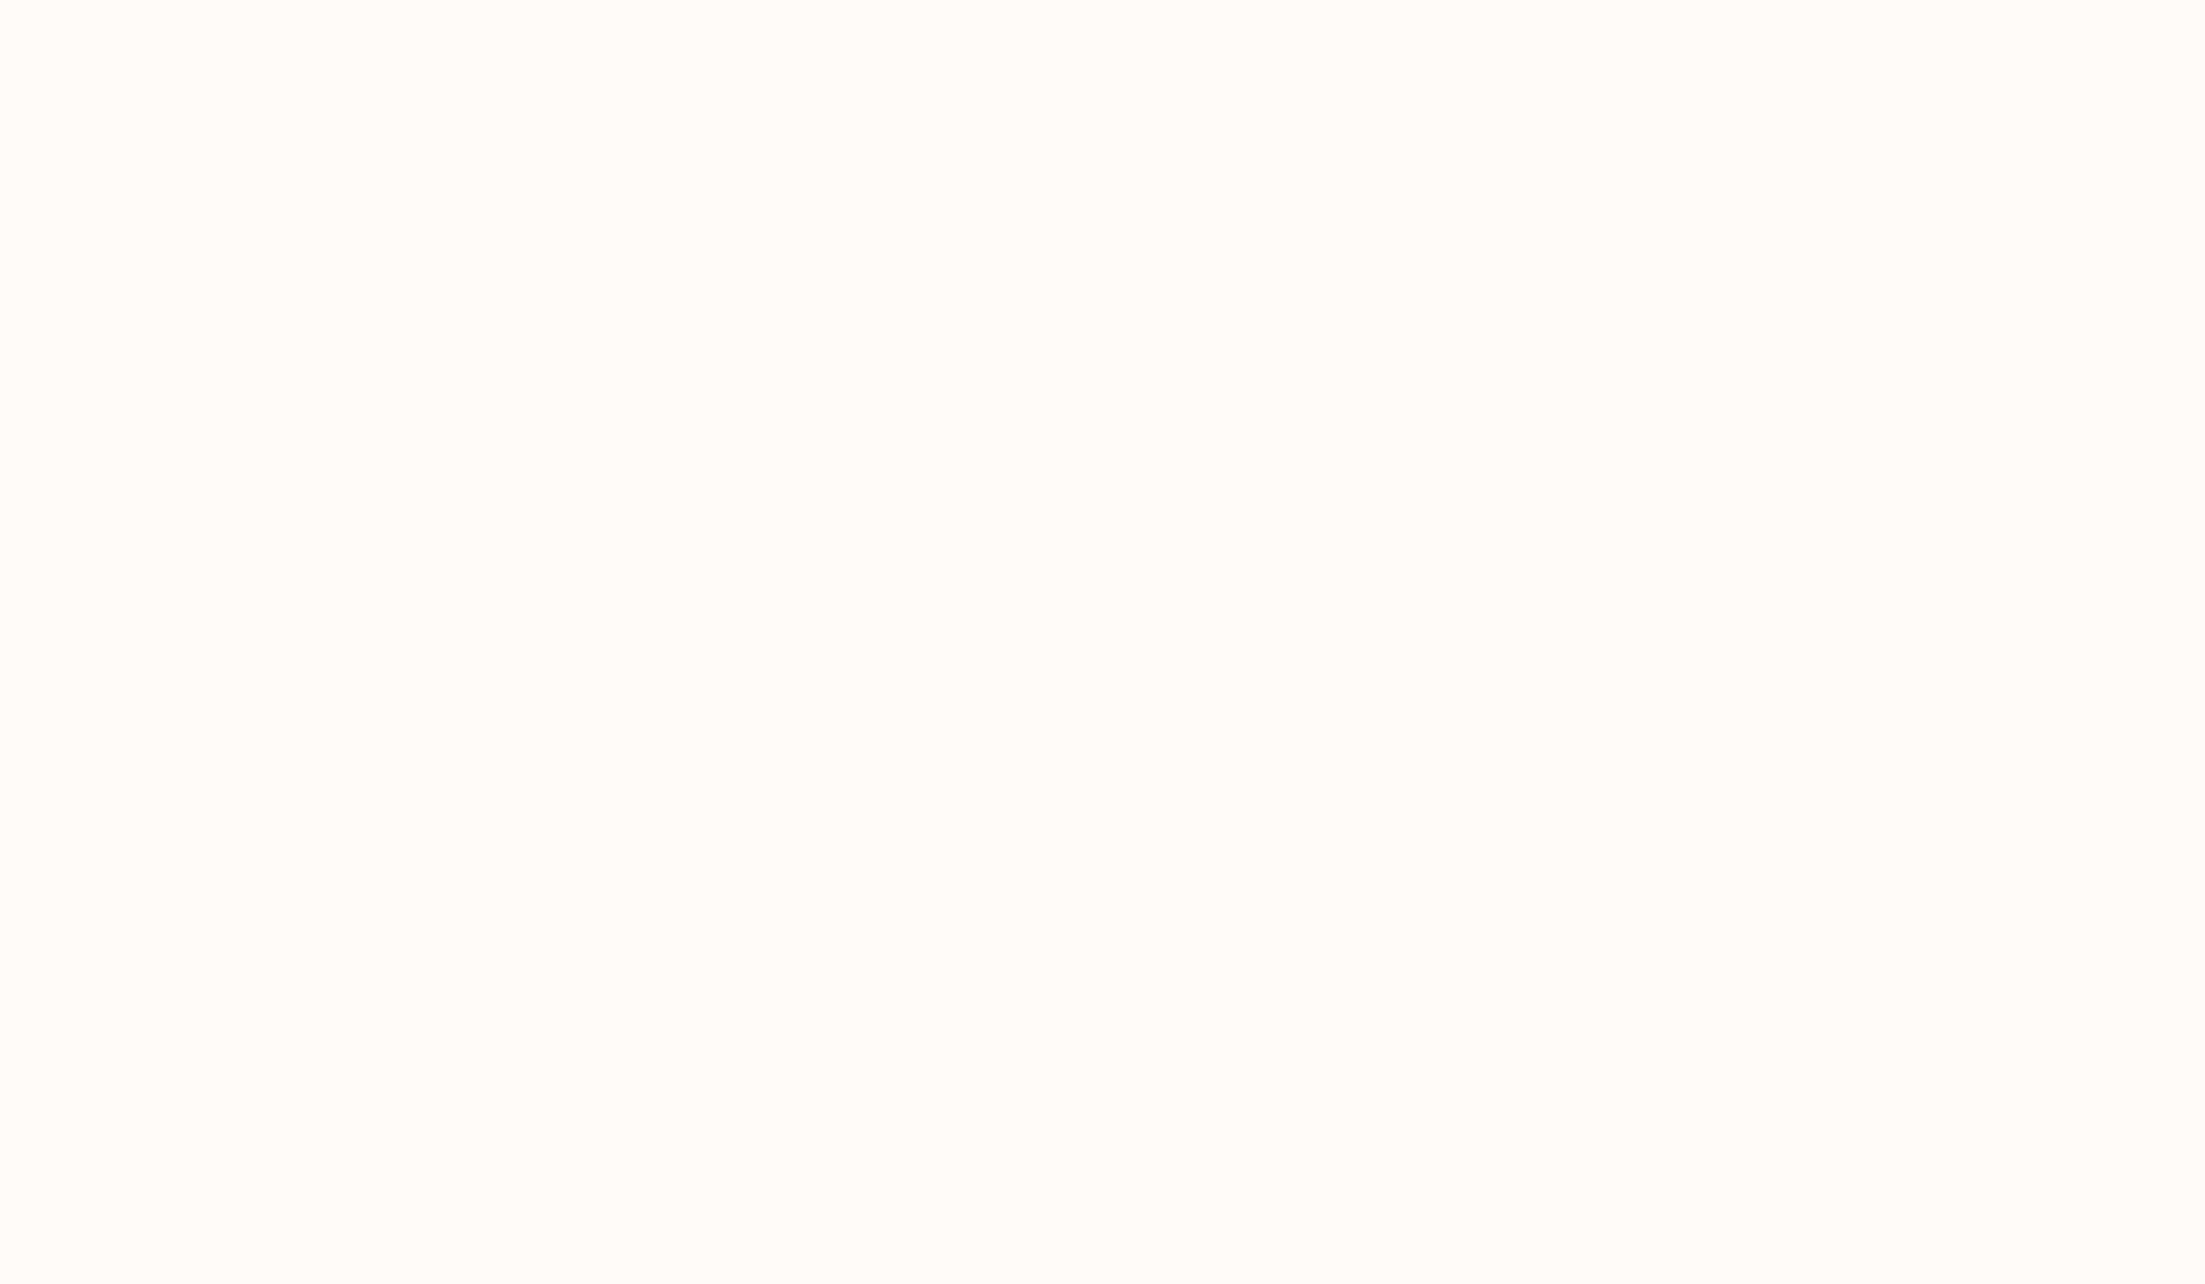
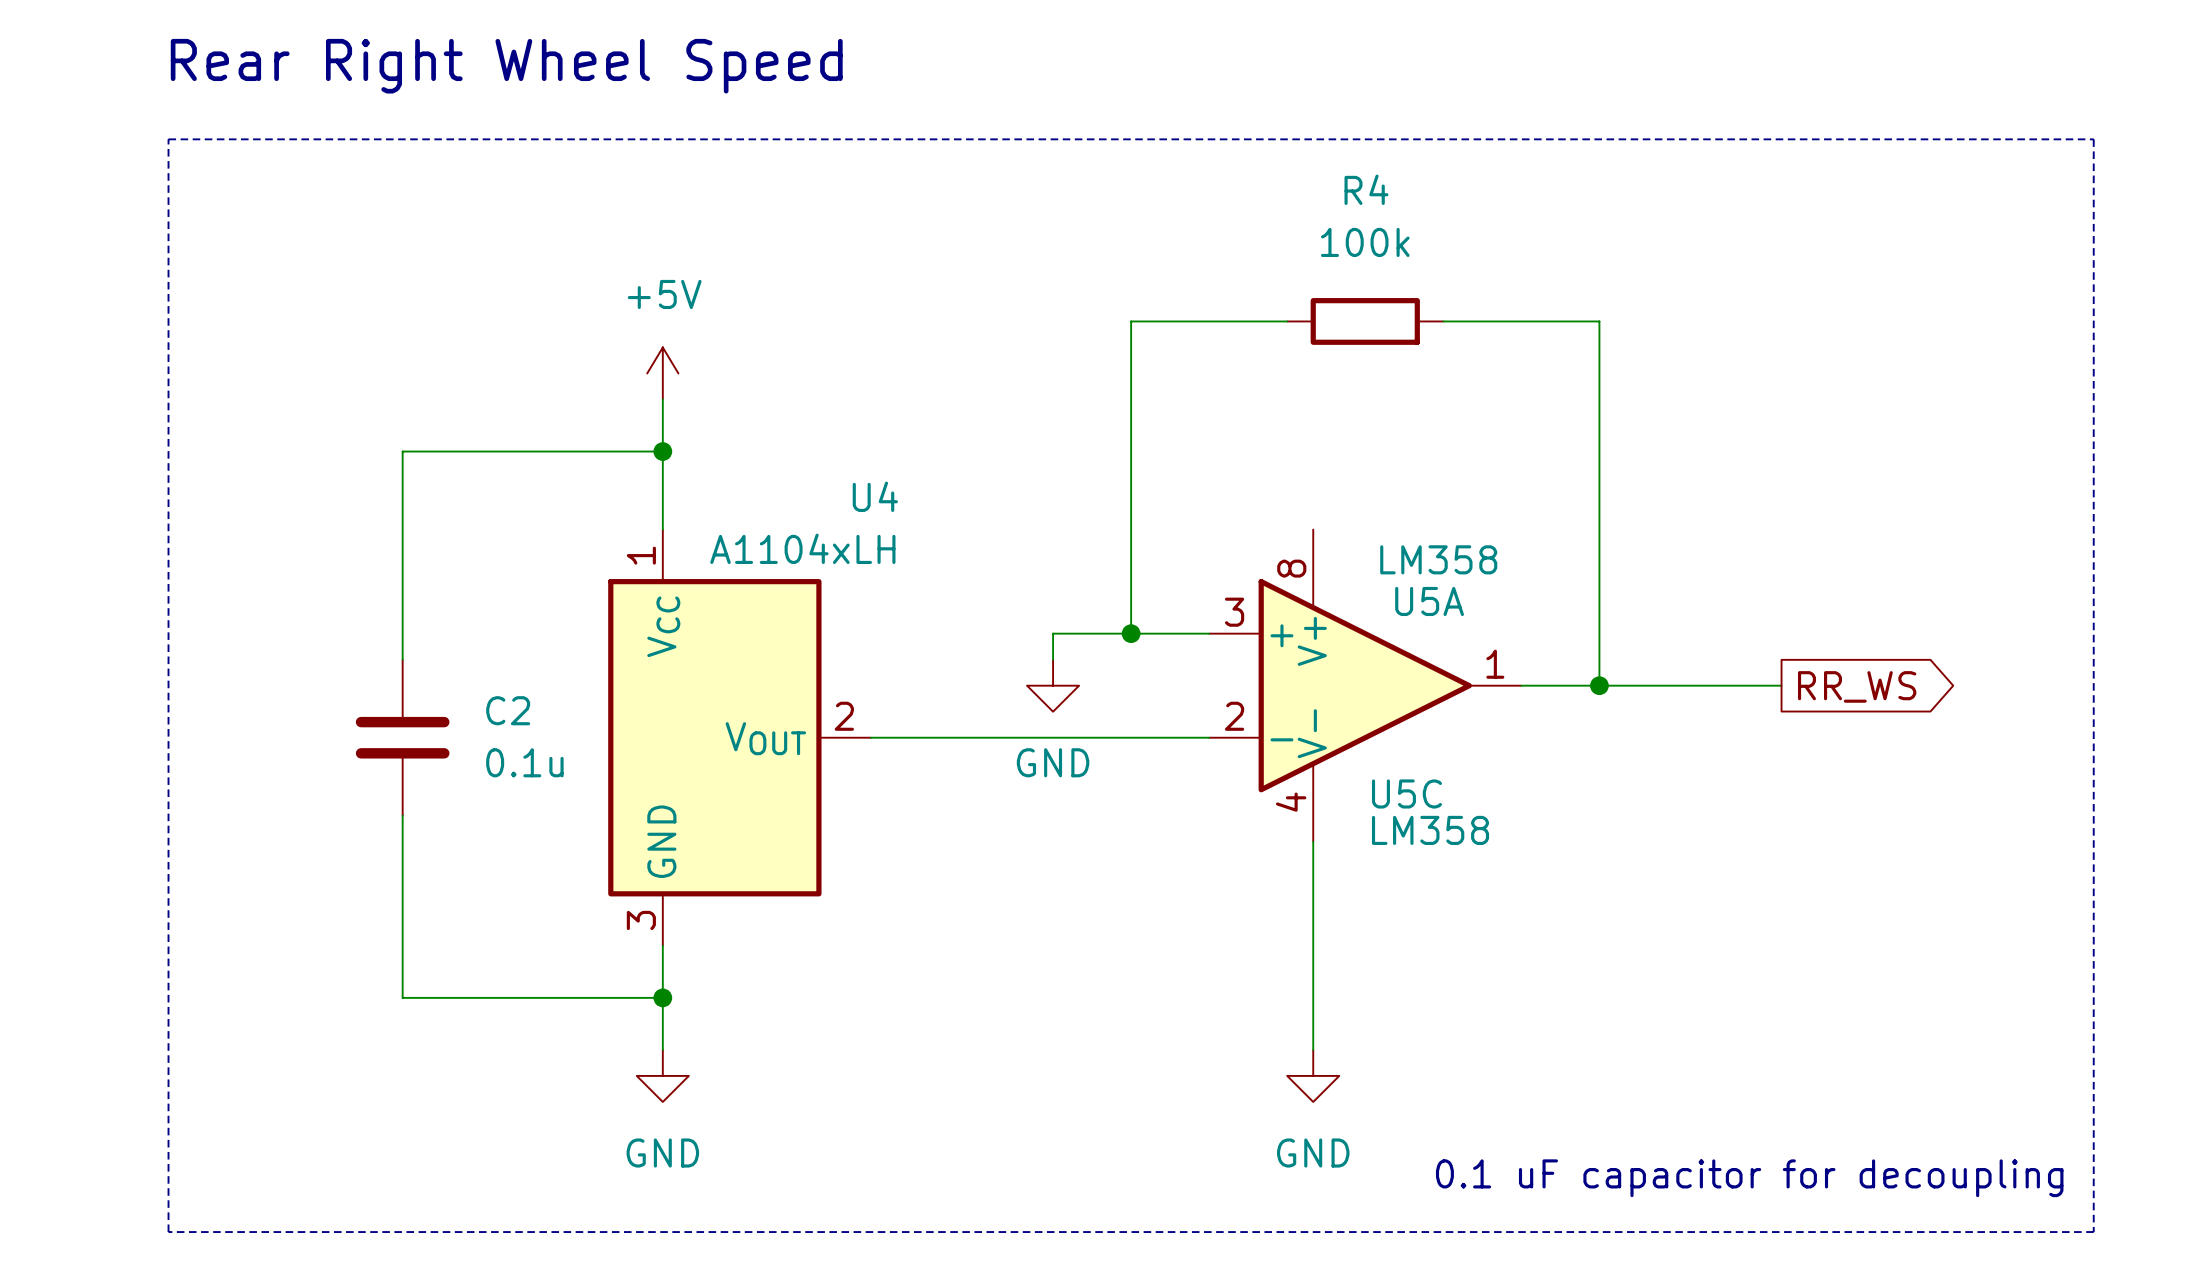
text: none -> Rear Right Wheel Speed (506, 66)
line: none -> (168, 139) (2093, 139) (2093, 1232) (168, 1232) (168, 139)
wire: none -> (1287, 321) (1131, 321) (1131, 633)
R4: none -> 100k (1365, 321)
wire: none -> (1443, 321) (1599, 321) (1599, 685)
power symbol: none -> +5V (662, 373)
wire: none -> (662, 399) (662, 529)
wire: none -> (662, 451) (402, 451) (402, 659)
junction: none -> (662, 451)
junction: none -> (1131, 633)
wire: none -> (1209, 633) (1053, 633) (1053, 659)
power symbol: none -> GND (1053, 685)
U5C: none -> LM358 (1313, 685)
U5A: none -> LM358 (1365, 685)
wire: none -> (1521, 685) (1781, 685)
junction: none -> (1599, 685)
global label: none -> RR_WS (1857, 686)
C2: none -> 0.1u (402, 737)
U4: none -> A1104xLH (739, 737)
wire: none -> (870, 737) (1209, 737)
wire: none -> (402, 815) (402, 997) (662, 997)
wire: none -> (1313, 841) (1313, 1049)
wire: none -> (662, 945) (662, 1049)
junction: none -> (662, 997)
power symbol: none -> GND (662, 1075)
power symbol: none -> GND (1313, 1075)
text: none -> 0.1 uF capacitor for decoupling (1749, 1178)

